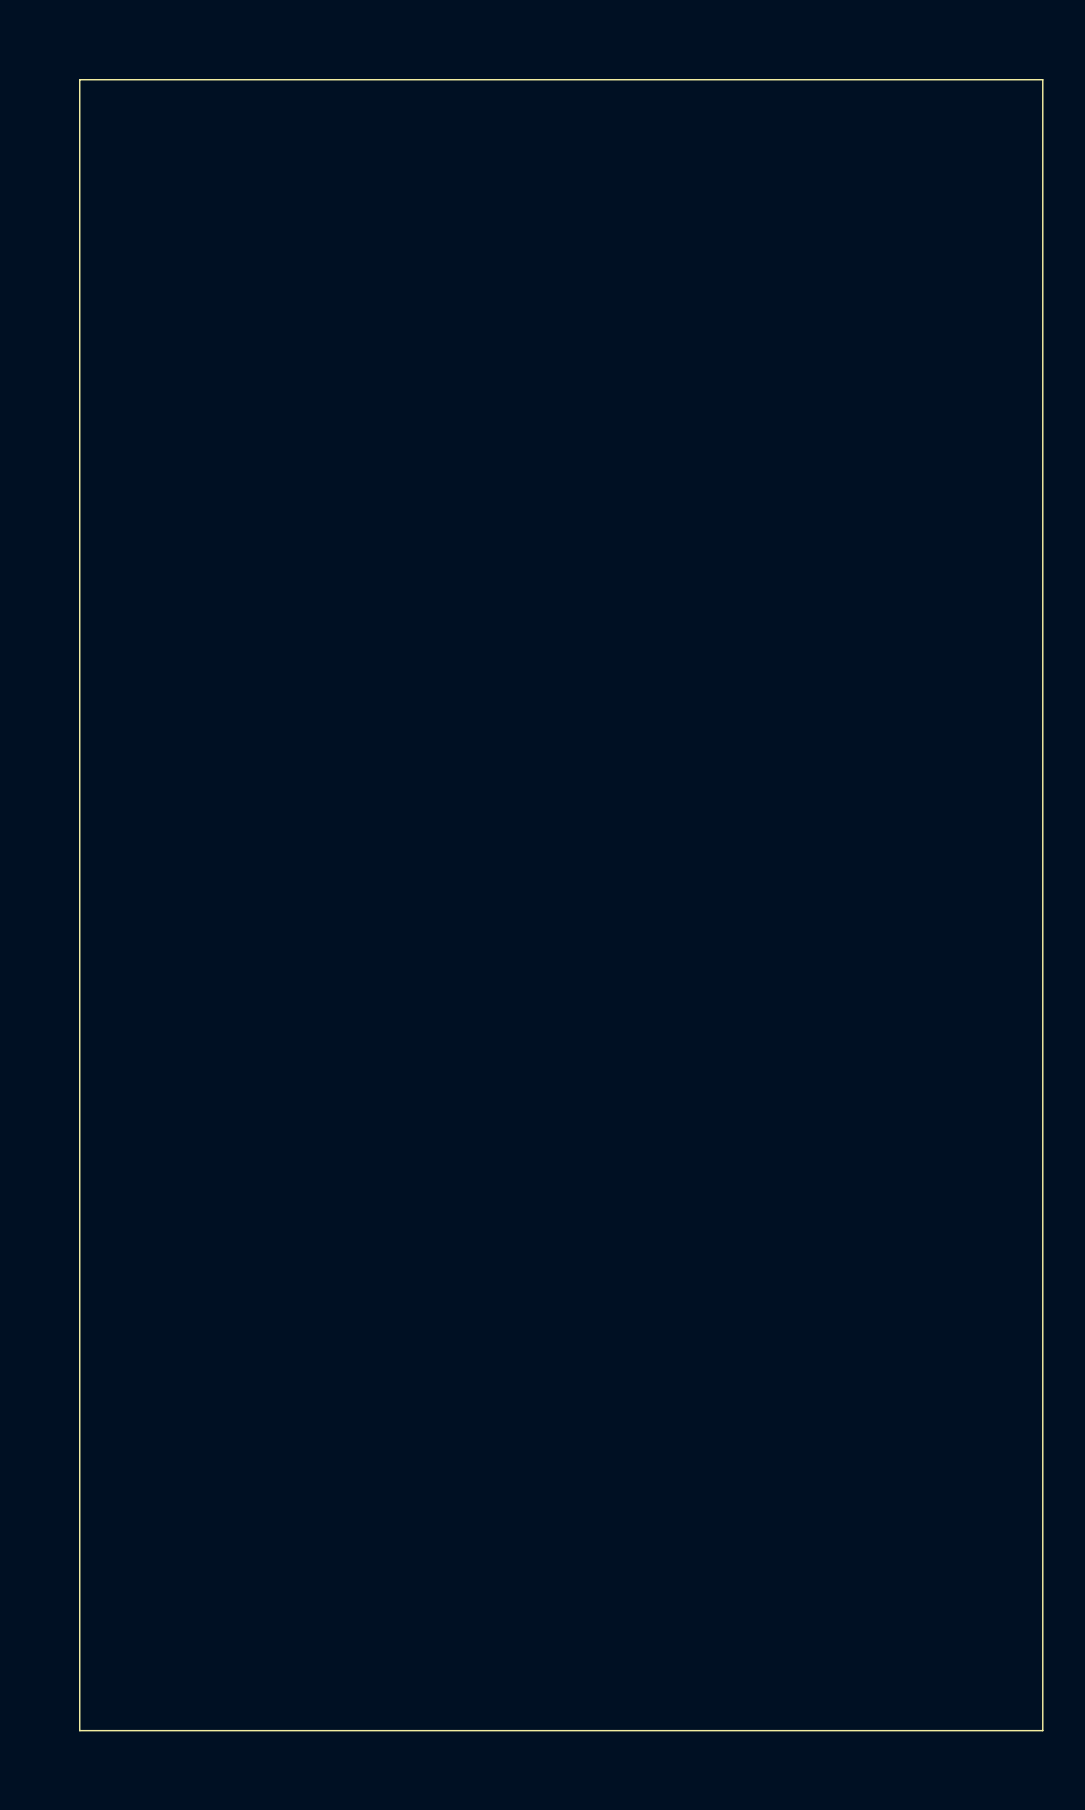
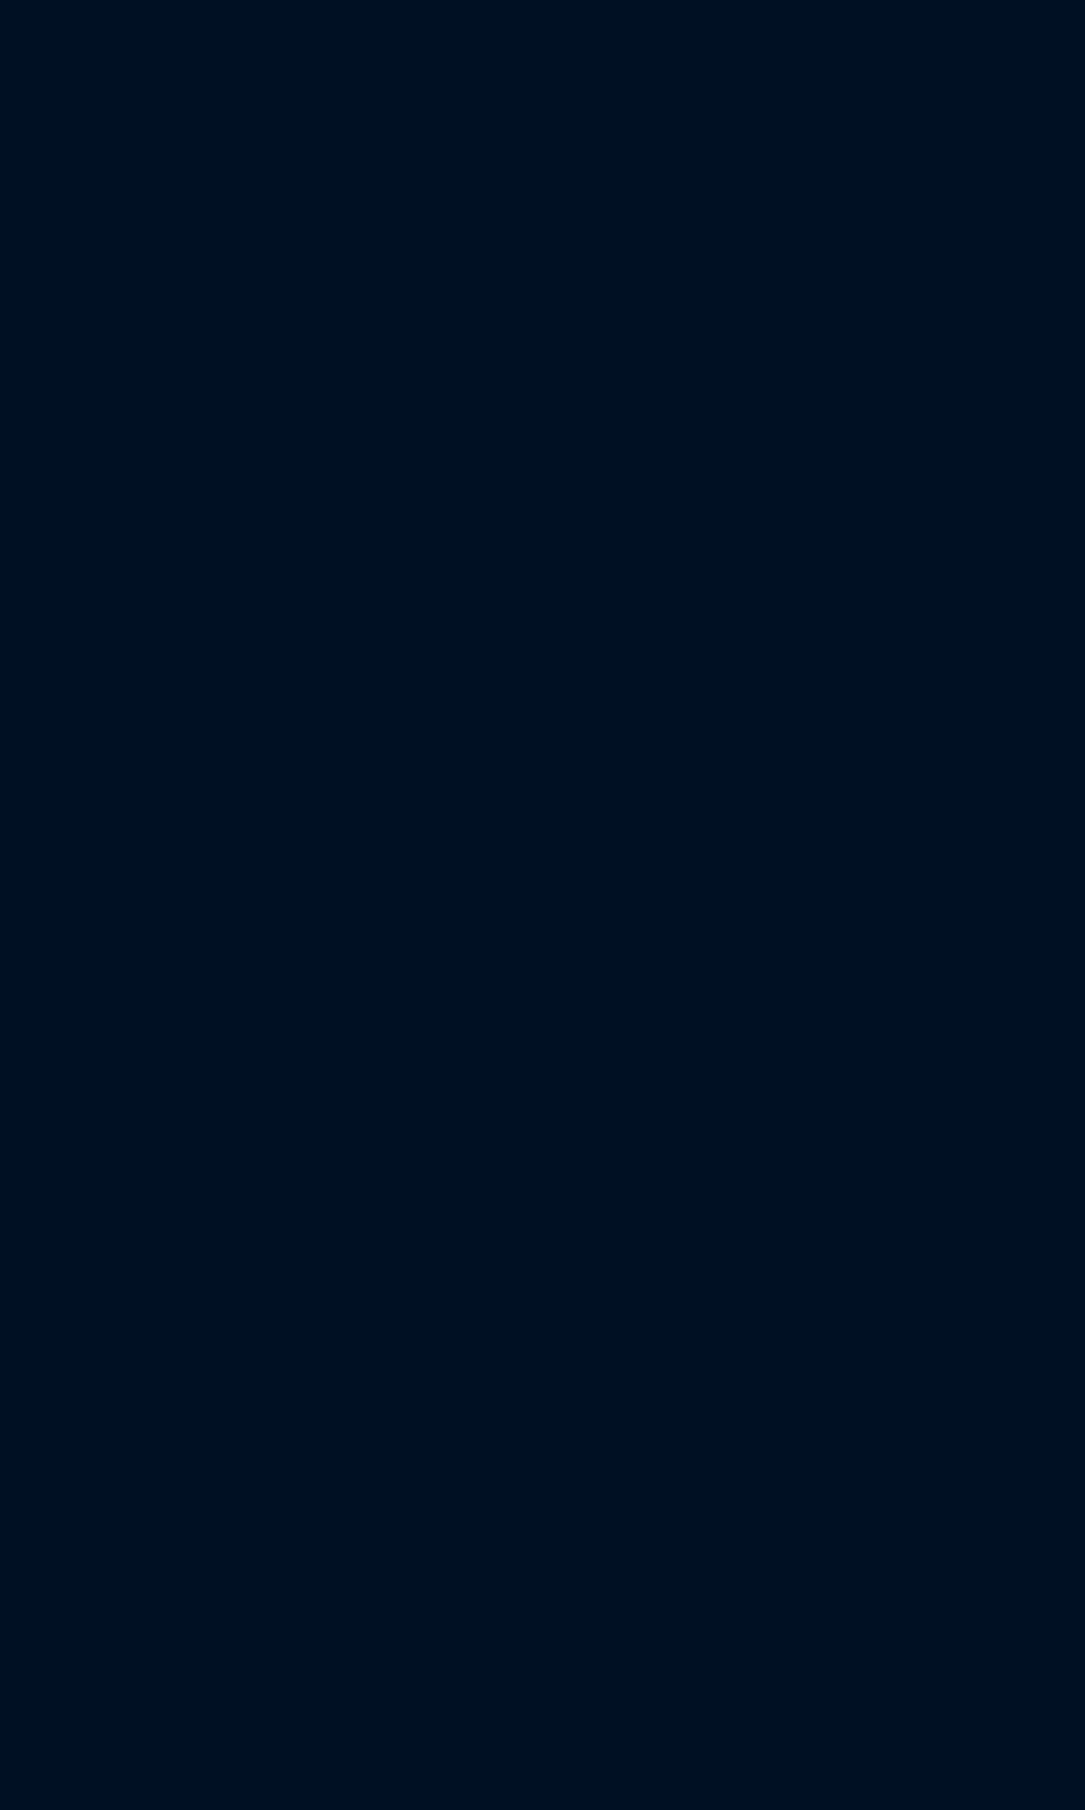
line: (79, 79) (1042, 79) (1042, 1730) (79, 1730) (79, 79) -> none

